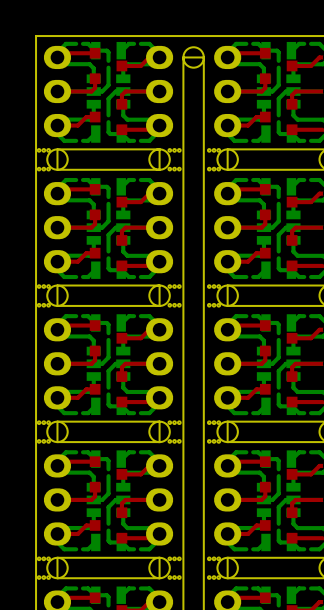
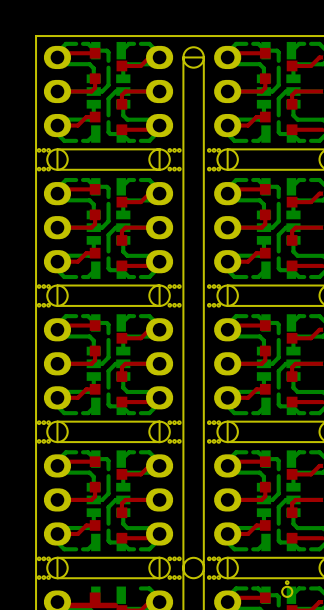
round board edge: none -> [182, 556, 205, 580]
round board edge: none -> [285, 580, 289, 585]
round board edge: none -> [281, 585, 294, 598]
bottom track: (76, 588) (65, 588) (57, 596) (57, 602) -> none
bottom track: (83, 588) (88, 588) (94, 595) (106, 595) (108, 605) -> none
bottom track: (134, 588) (128, 588) (121, 595) -> none
top track: (95, 597) (61, 597) (57, 602) -> (115, 605) (60, 605) (57, 602)

